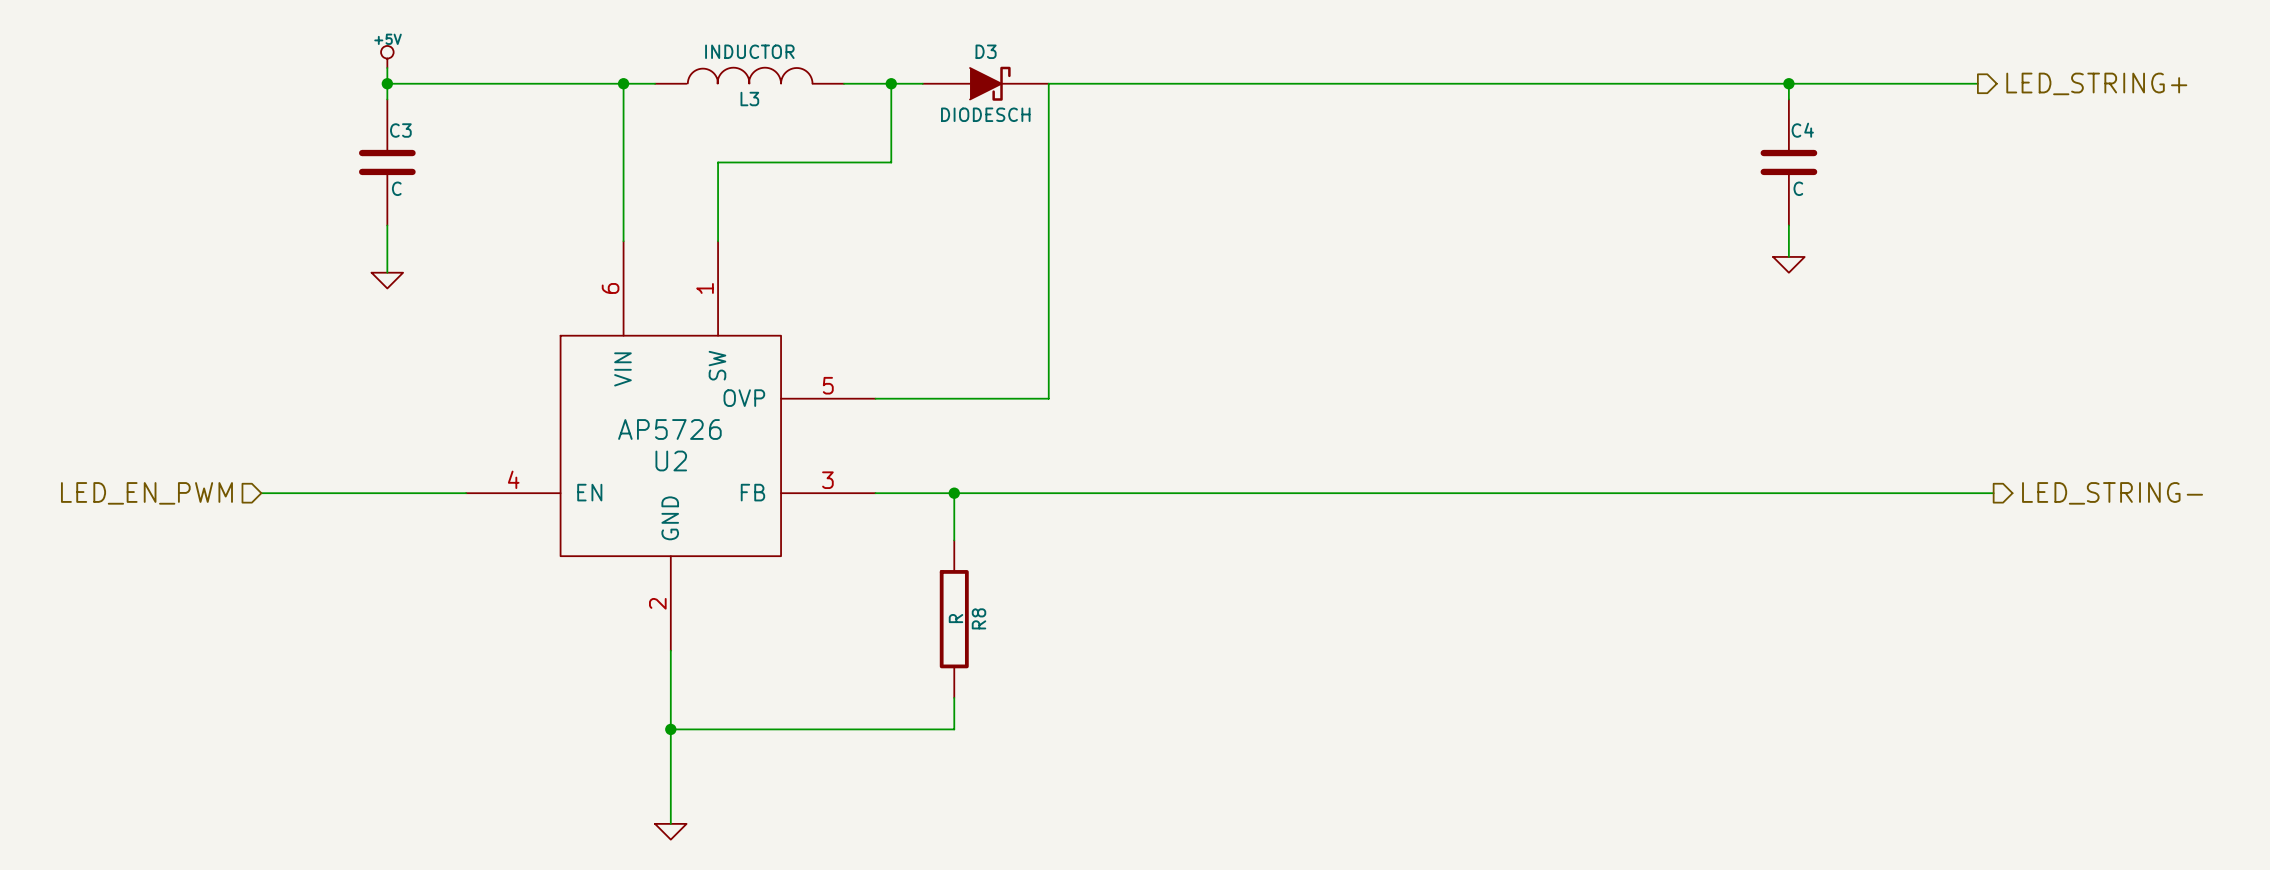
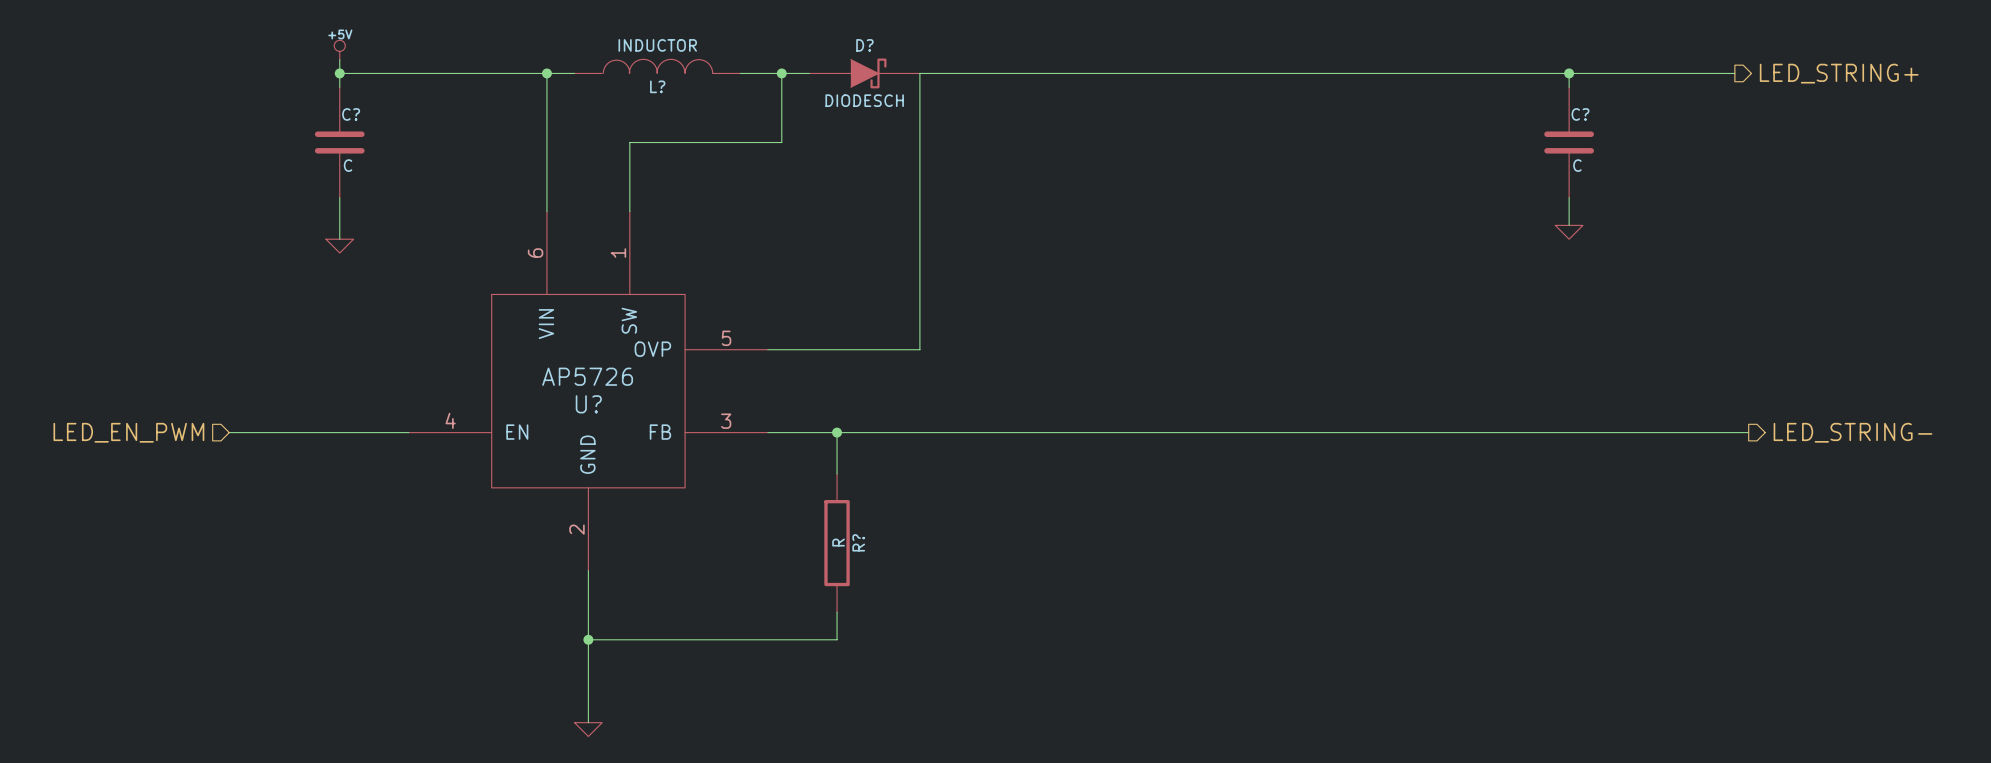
D3 name: D3 (986, 51) -> D? (864, 45)
L3 name: L3 (749, 99) -> L? (657, 86)
C3 name: C3 (400, 130) -> C? (351, 114)
C4 name: C4 (1802, 130) -> C? (1580, 114)
U2 name: U2 (671, 460) -> U? (588, 404)
R8 name: R8 (979, 618) -> R? (858, 542)

